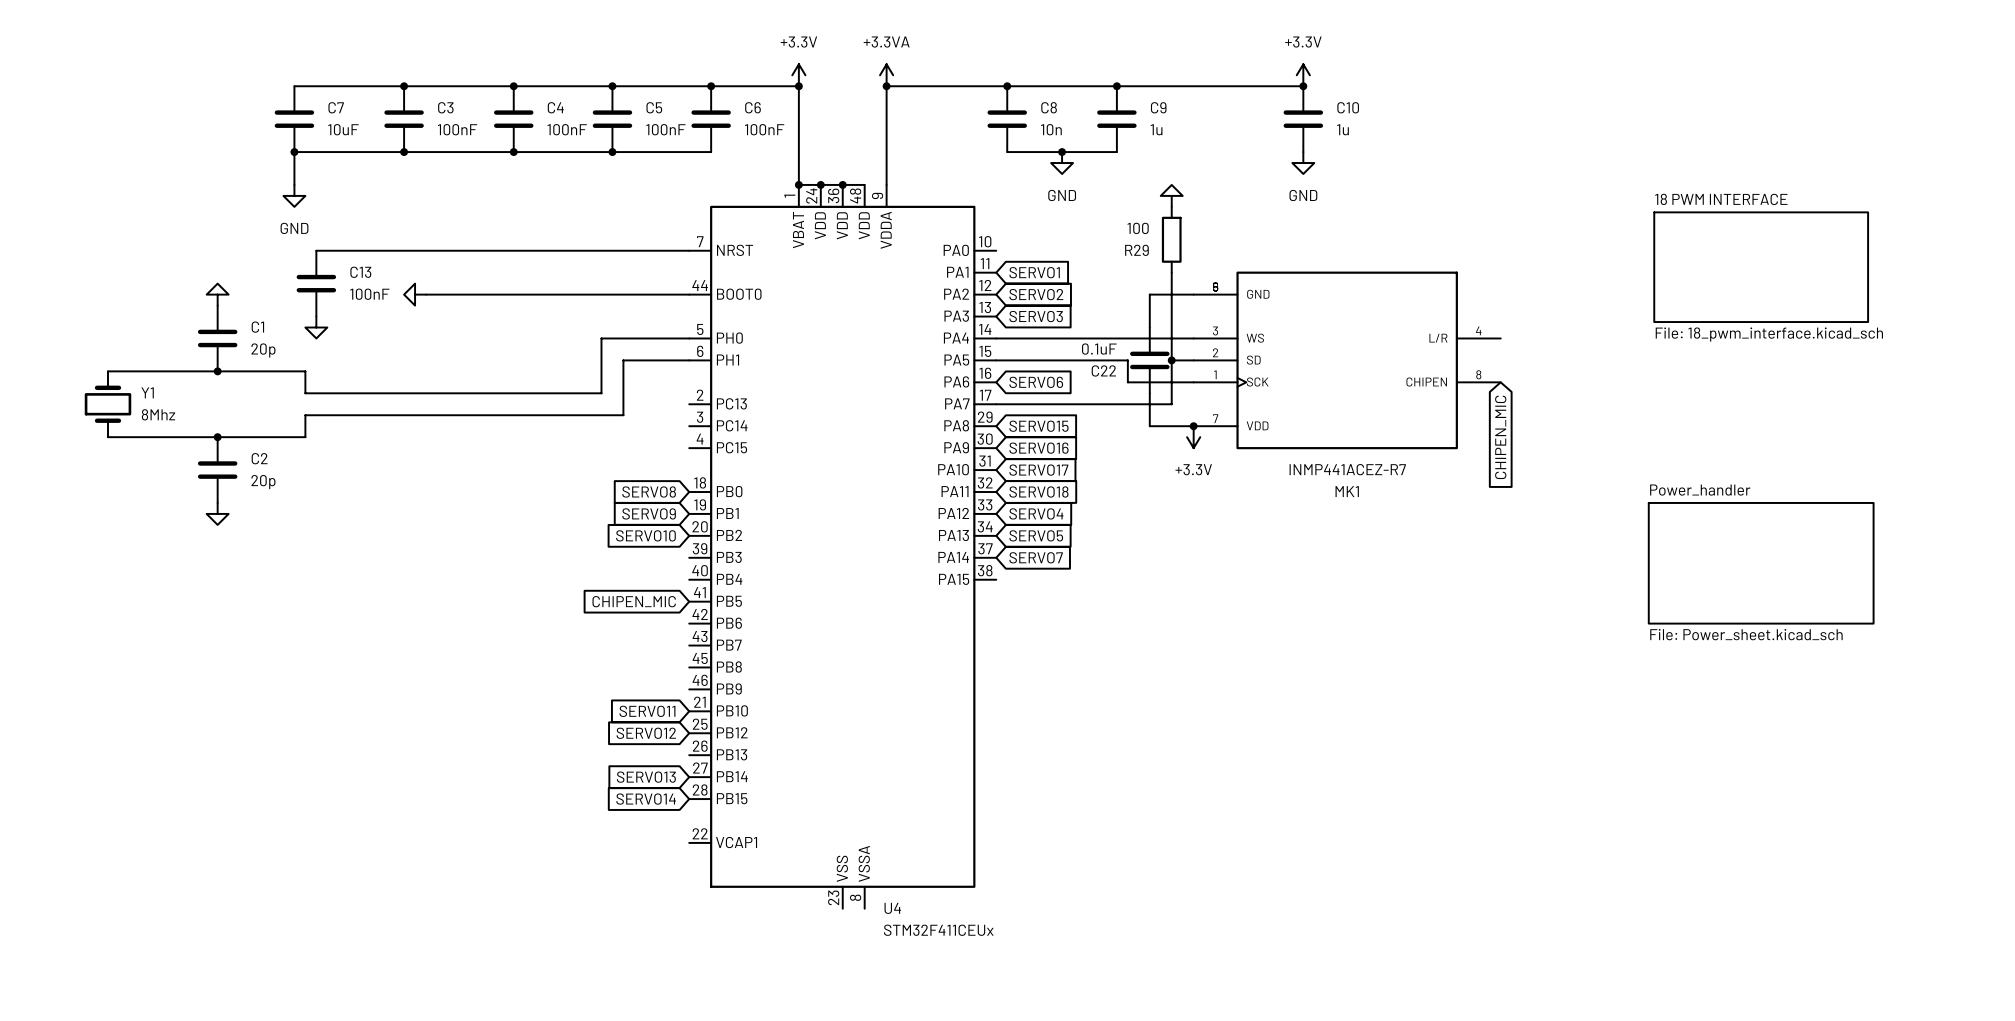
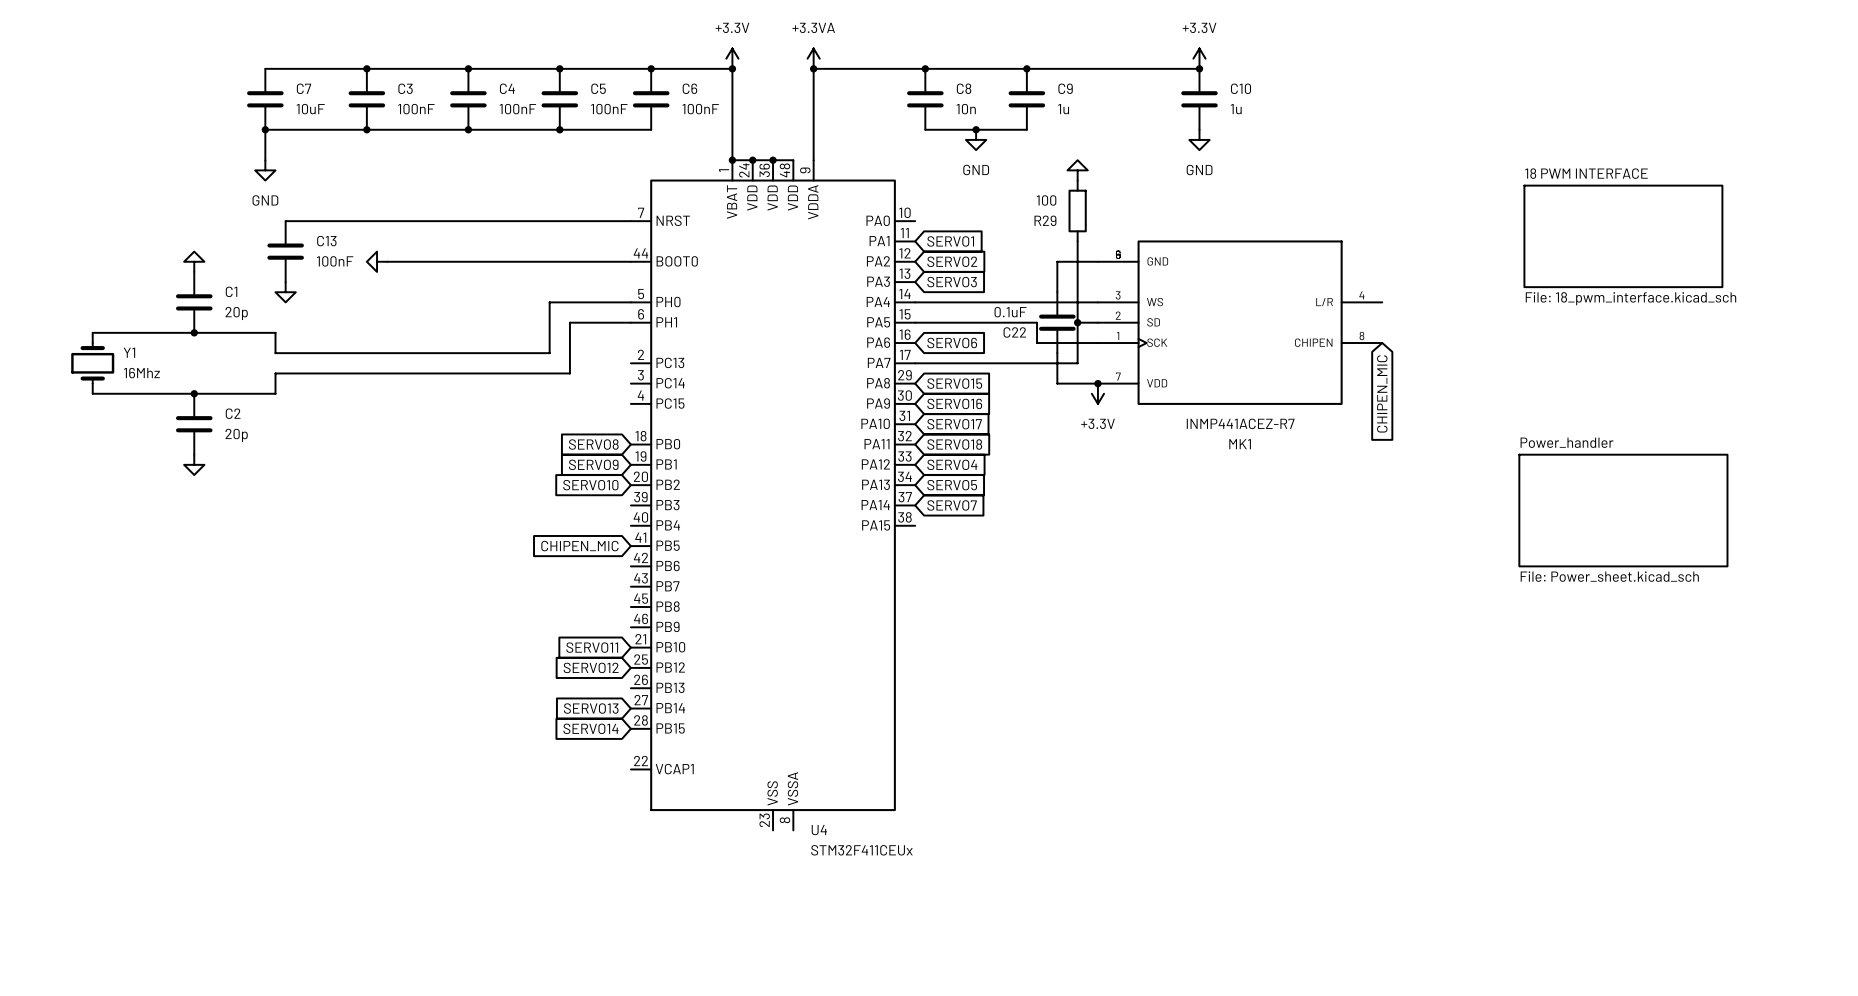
Y1 value: 8Mhz (158, 414) -> 16Mhz (141, 373)

